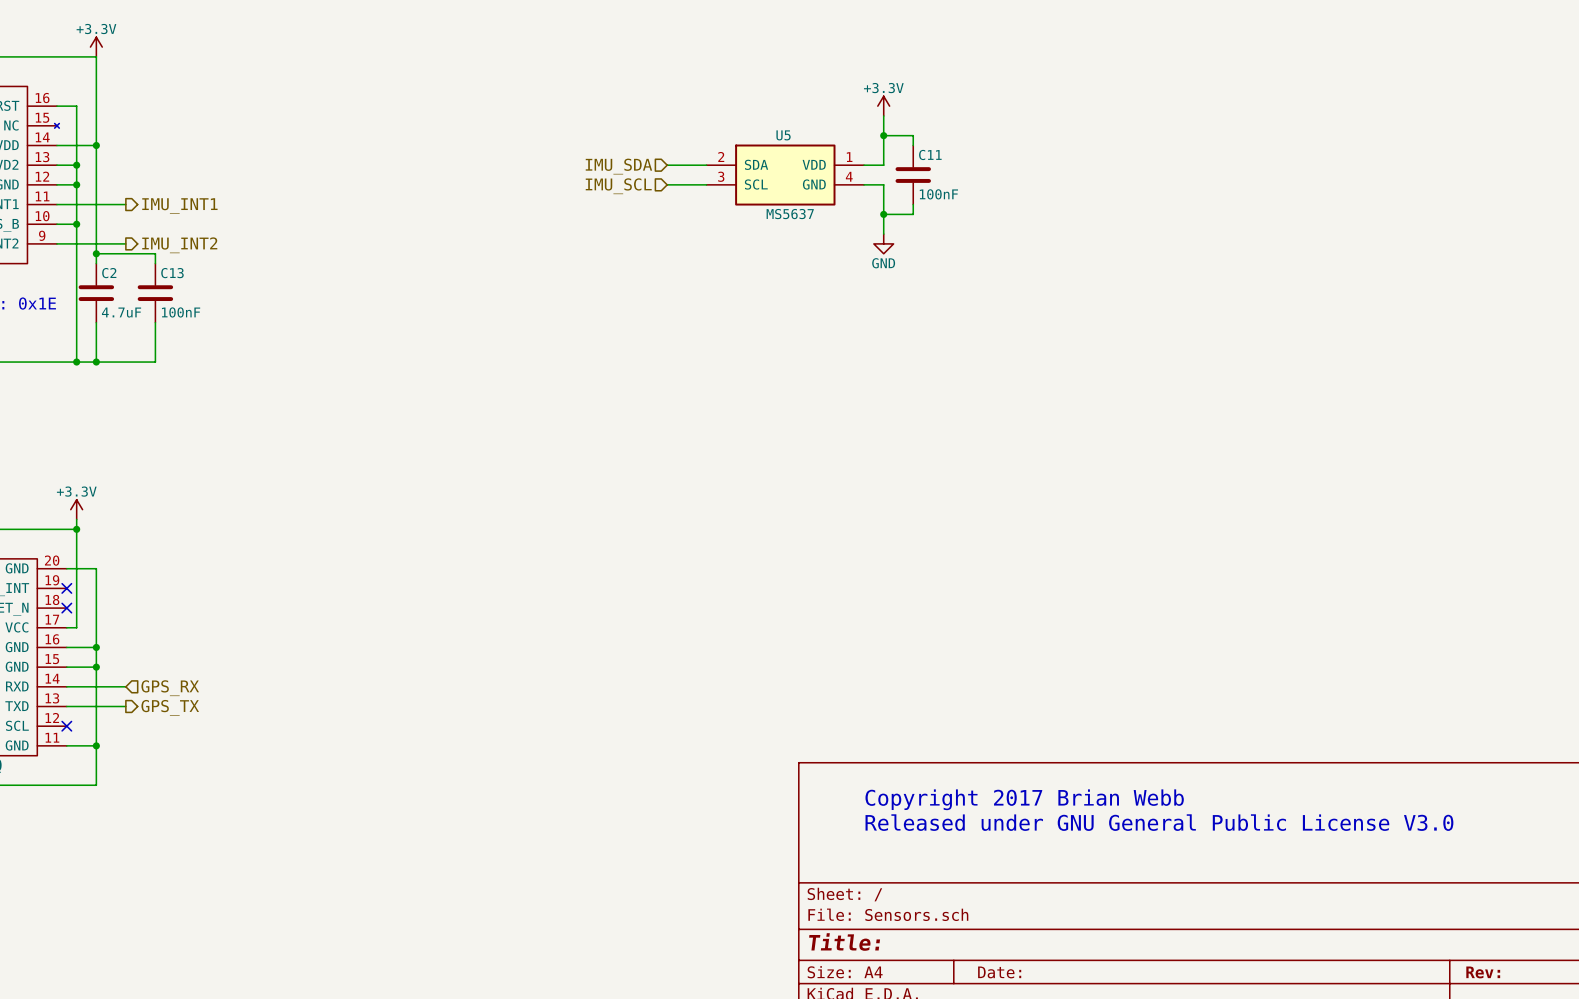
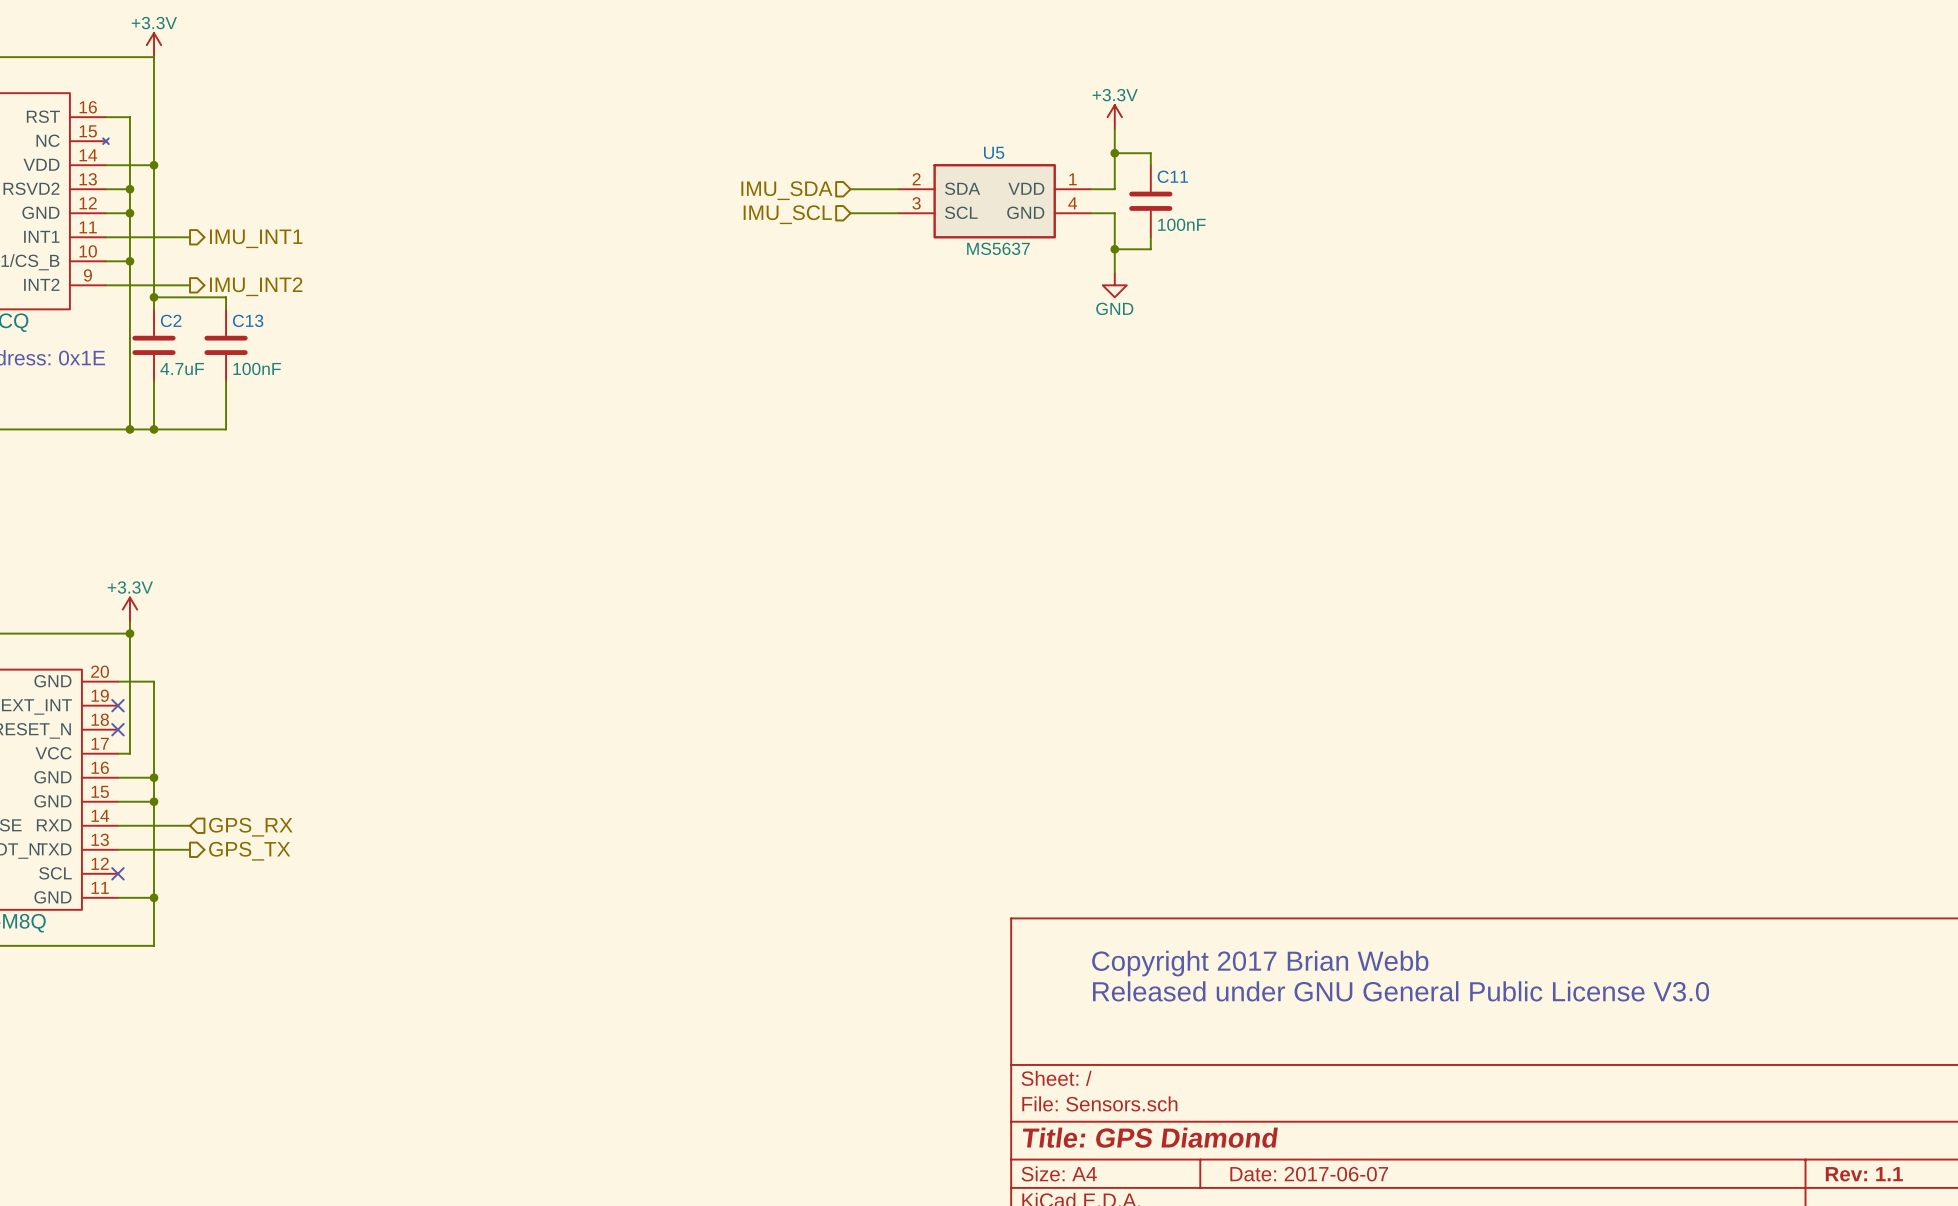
title block: Title: (844, 941) -> Title: GPS Diamond (1150, 1137)
title block: Date: (999, 972) -> Date: 2017-06-07 (1309, 1174)
title block: Rev: (1483, 972) -> Rev: 1.1 (1864, 1174)

